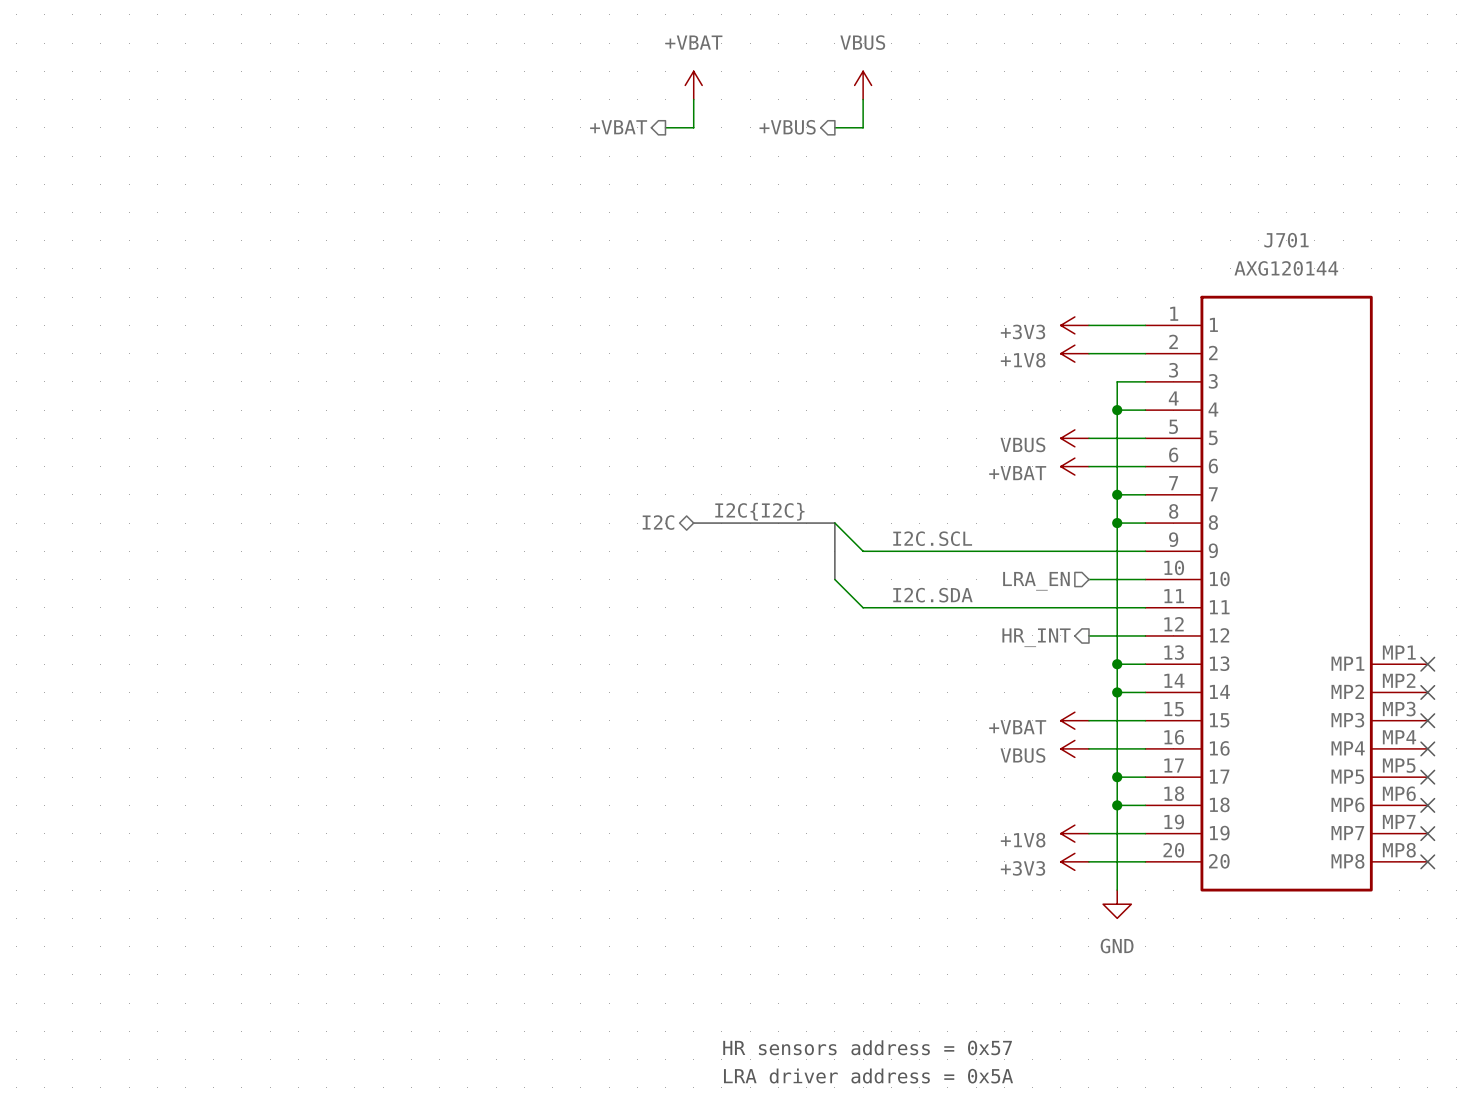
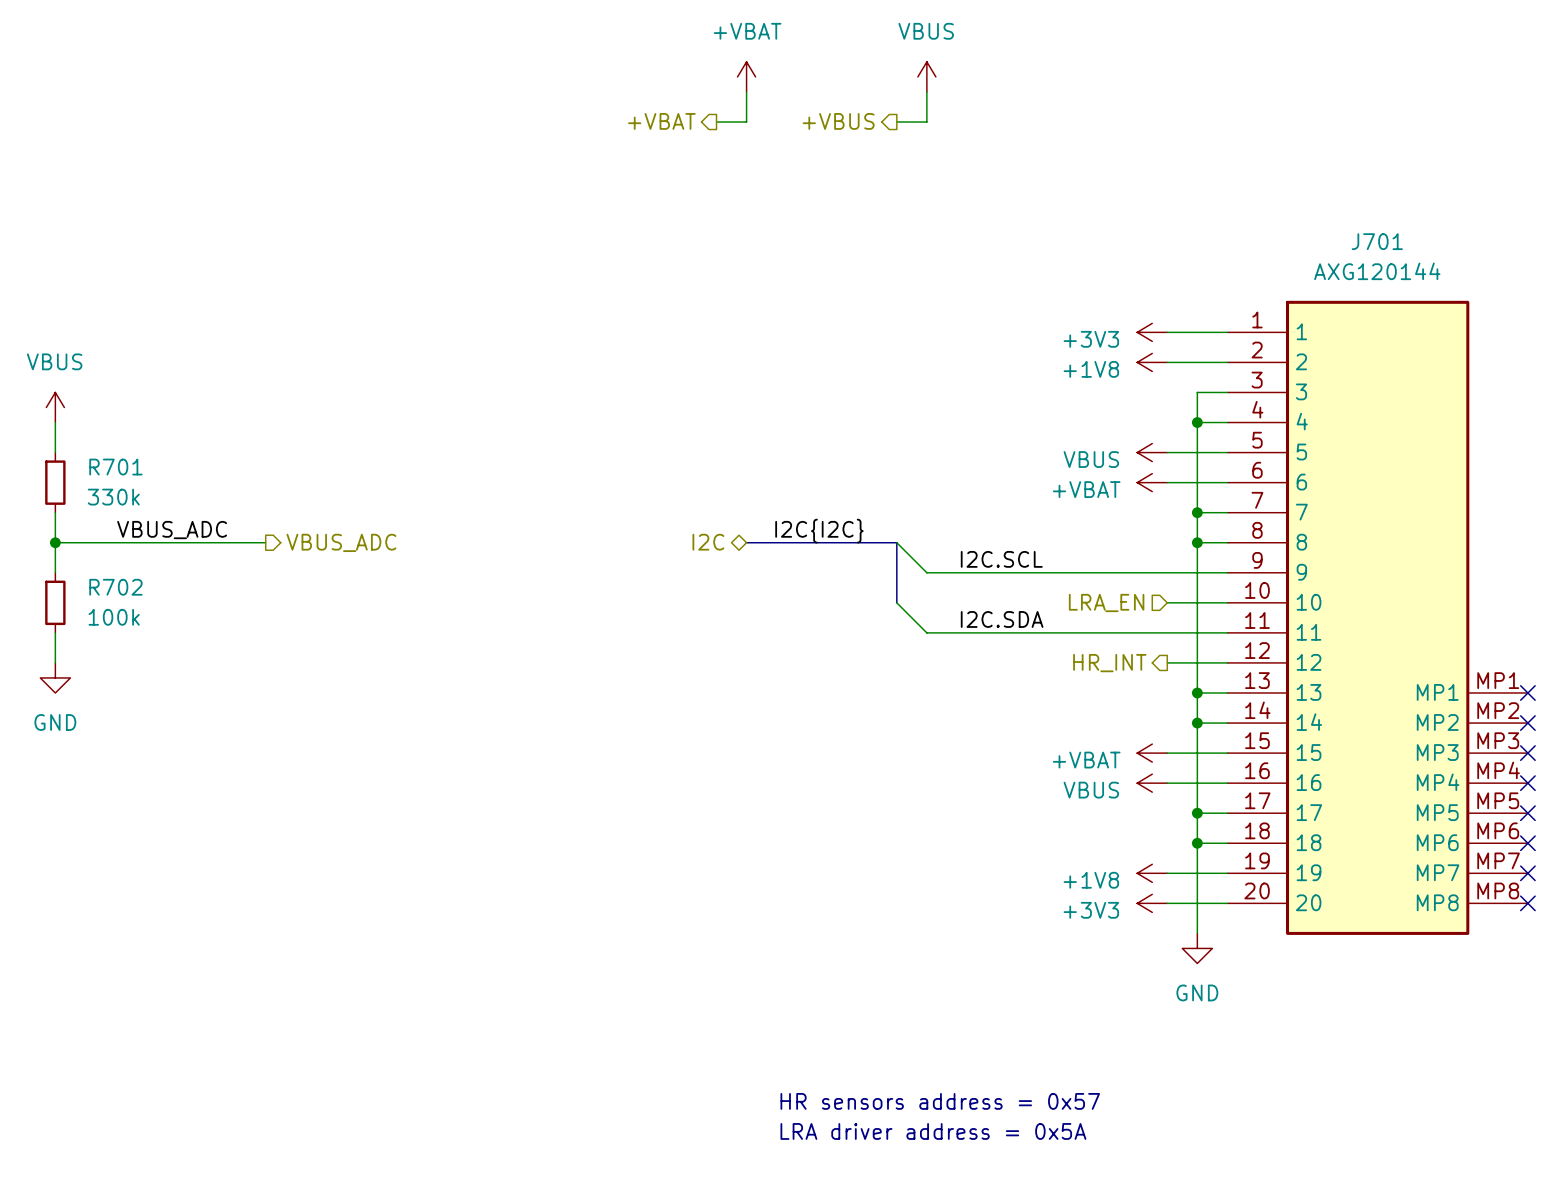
power symbol: none -> VBUS (55, 407)
wire: none -> (55, 422) (55, 452)
R701: none -> 330k (55, 482)
wire: none -> (55, 512) (55, 572)
label: none -> VBUS_ADC (172, 530)
wire: none -> (55, 542) (265, 542)
junction: none -> (55, 542)
hierarchical label: none -> VBUS_ADC (341, 542)
R702: none -> 100k (55, 602)
wire: none -> (55, 632) (55, 662)
power symbol: none -> GND (55, 677)

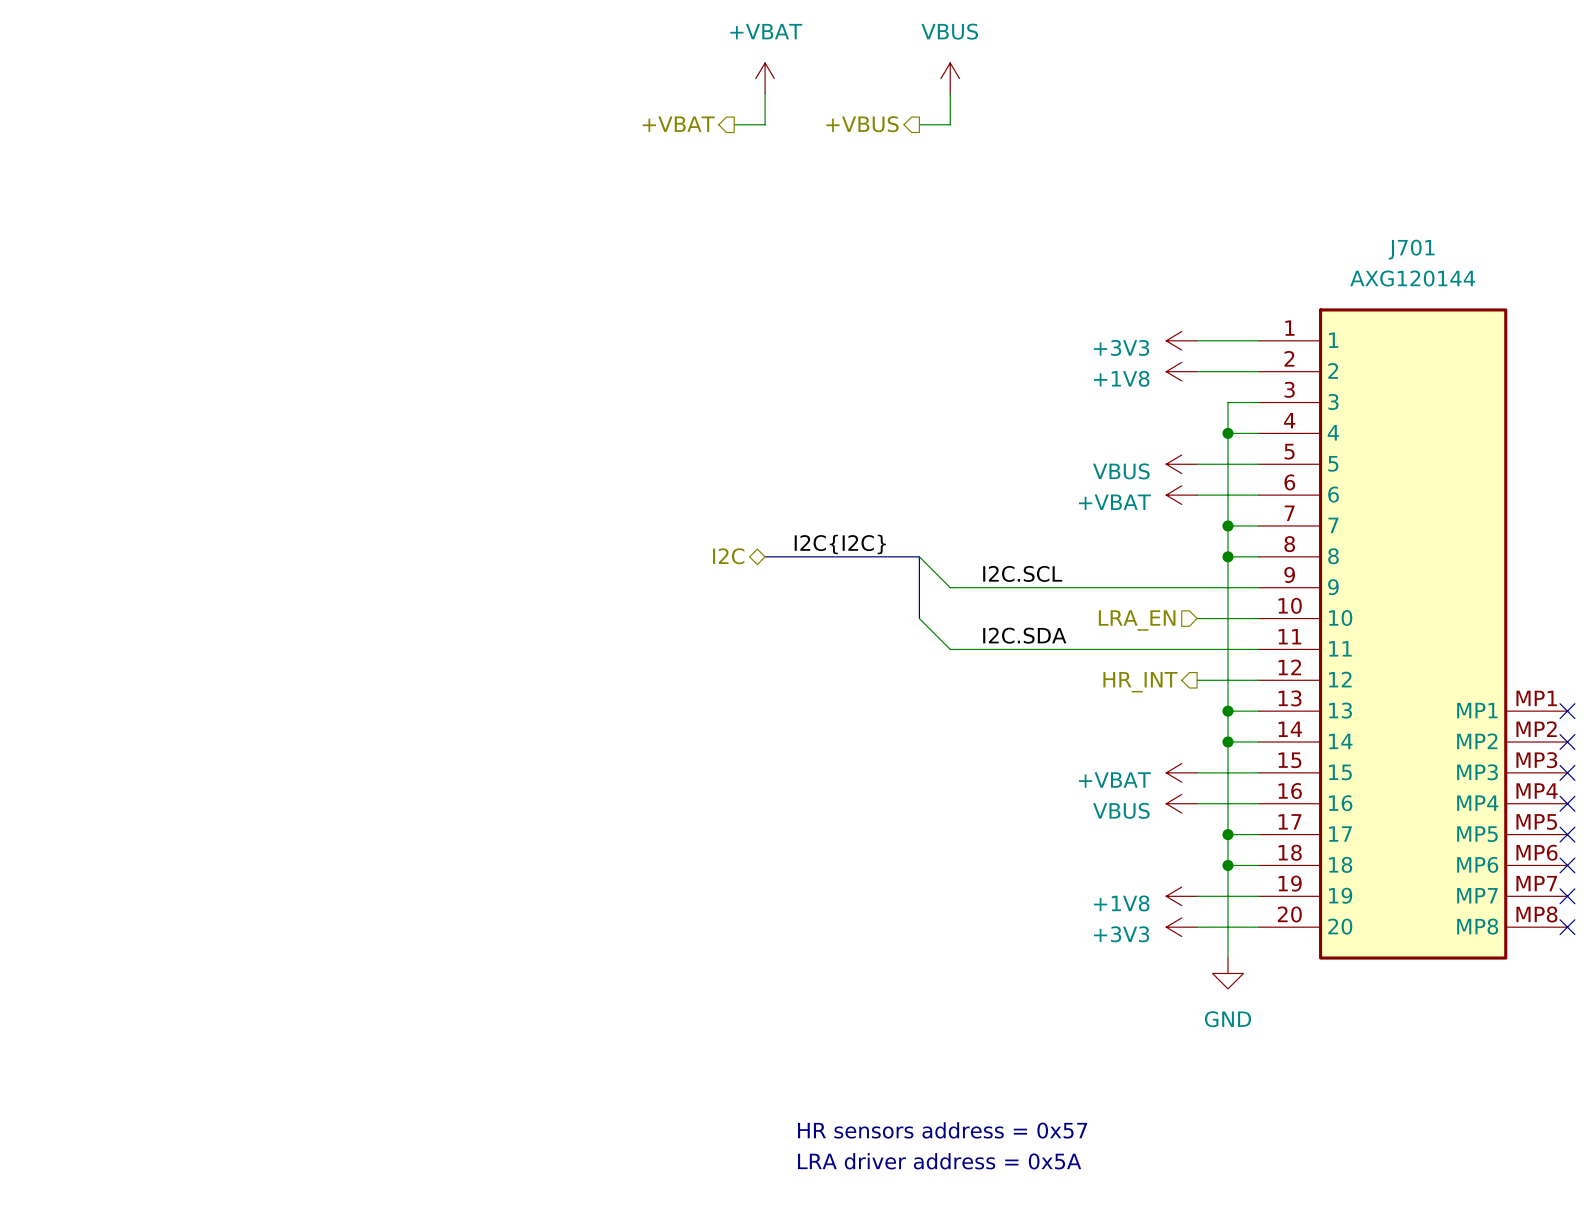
power symbol: VBUS (55, 407) -> none
wire: (55, 422) (55, 452) -> none
R701: 330k (55, 482) -> none
wire: (55, 512) (55, 572) -> none
label: VBUS_ADC (172, 530) -> none
wire: (55, 542) (265, 542) -> none
junction: (55, 542) -> none
hierarchical label: VBUS_ADC (341, 542) -> none
R702: 100k (55, 602) -> none
wire: (55, 632) (55, 662) -> none
power symbol: GND (55, 677) -> none

